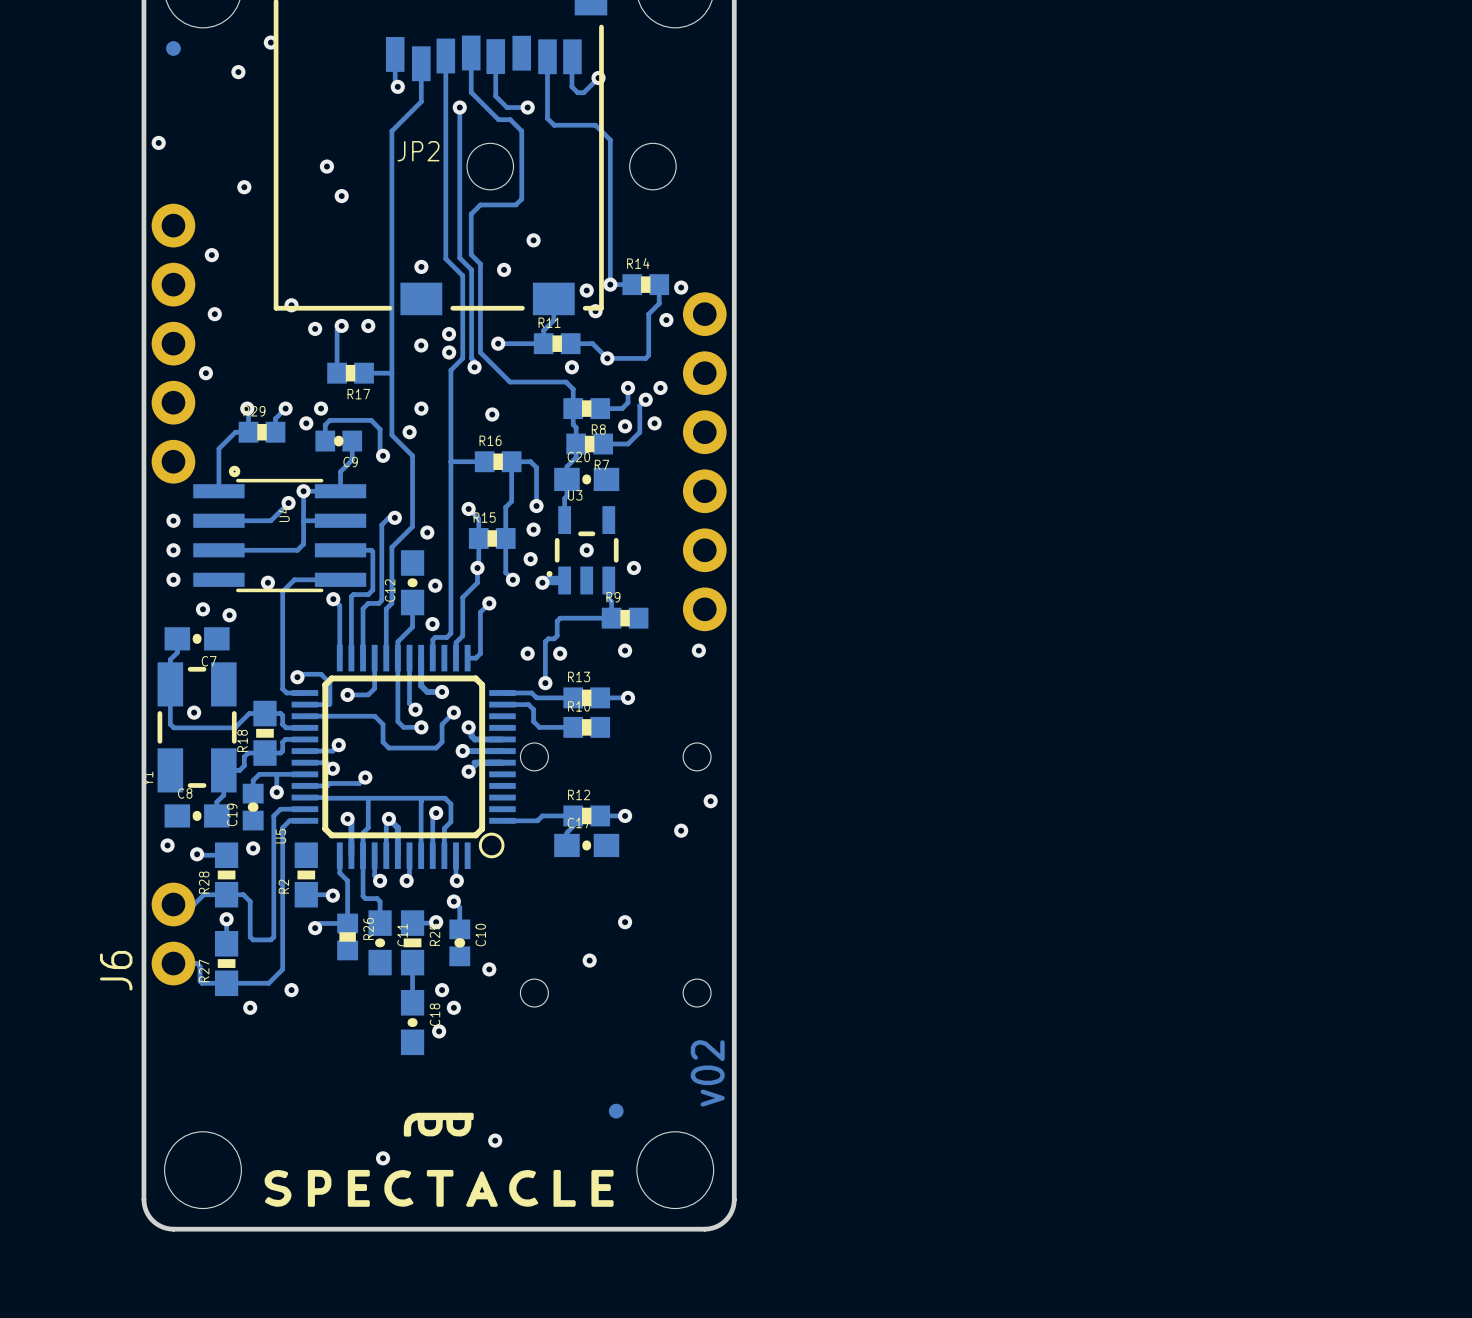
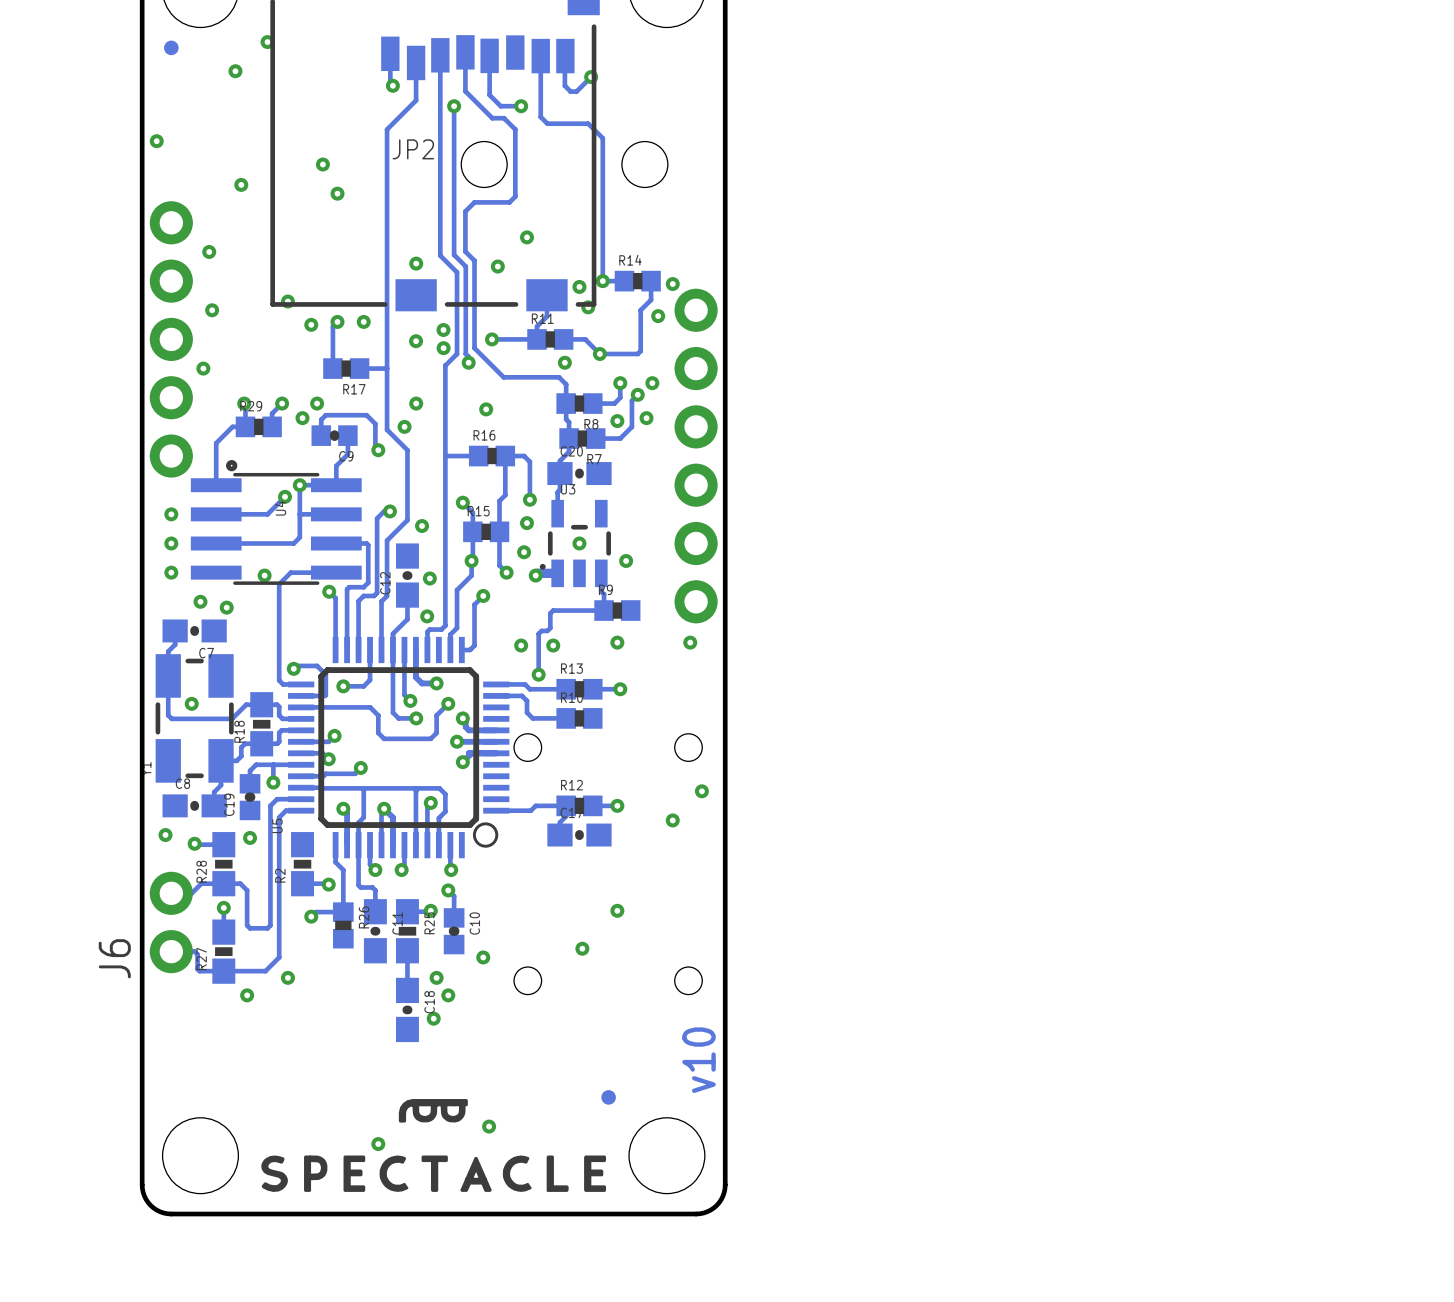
text: v02 (707, 1073) -> v10 (699, 1060)

